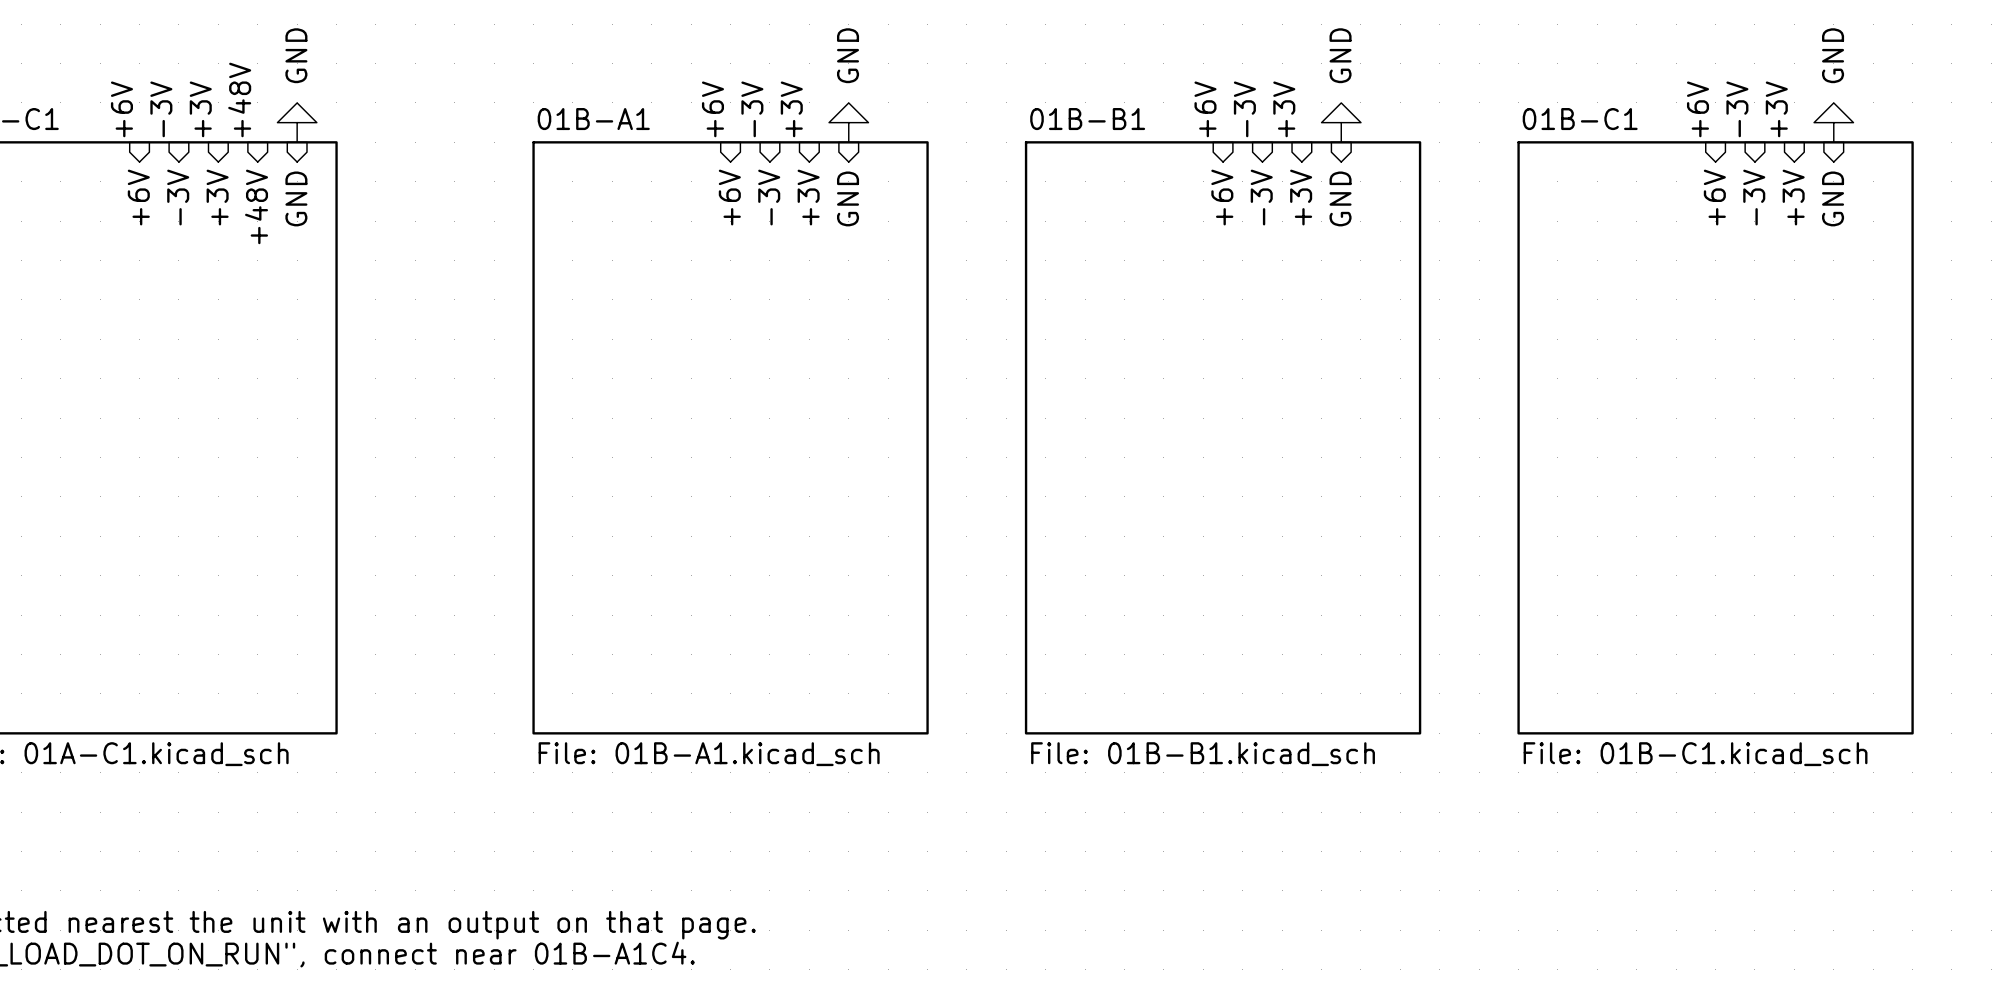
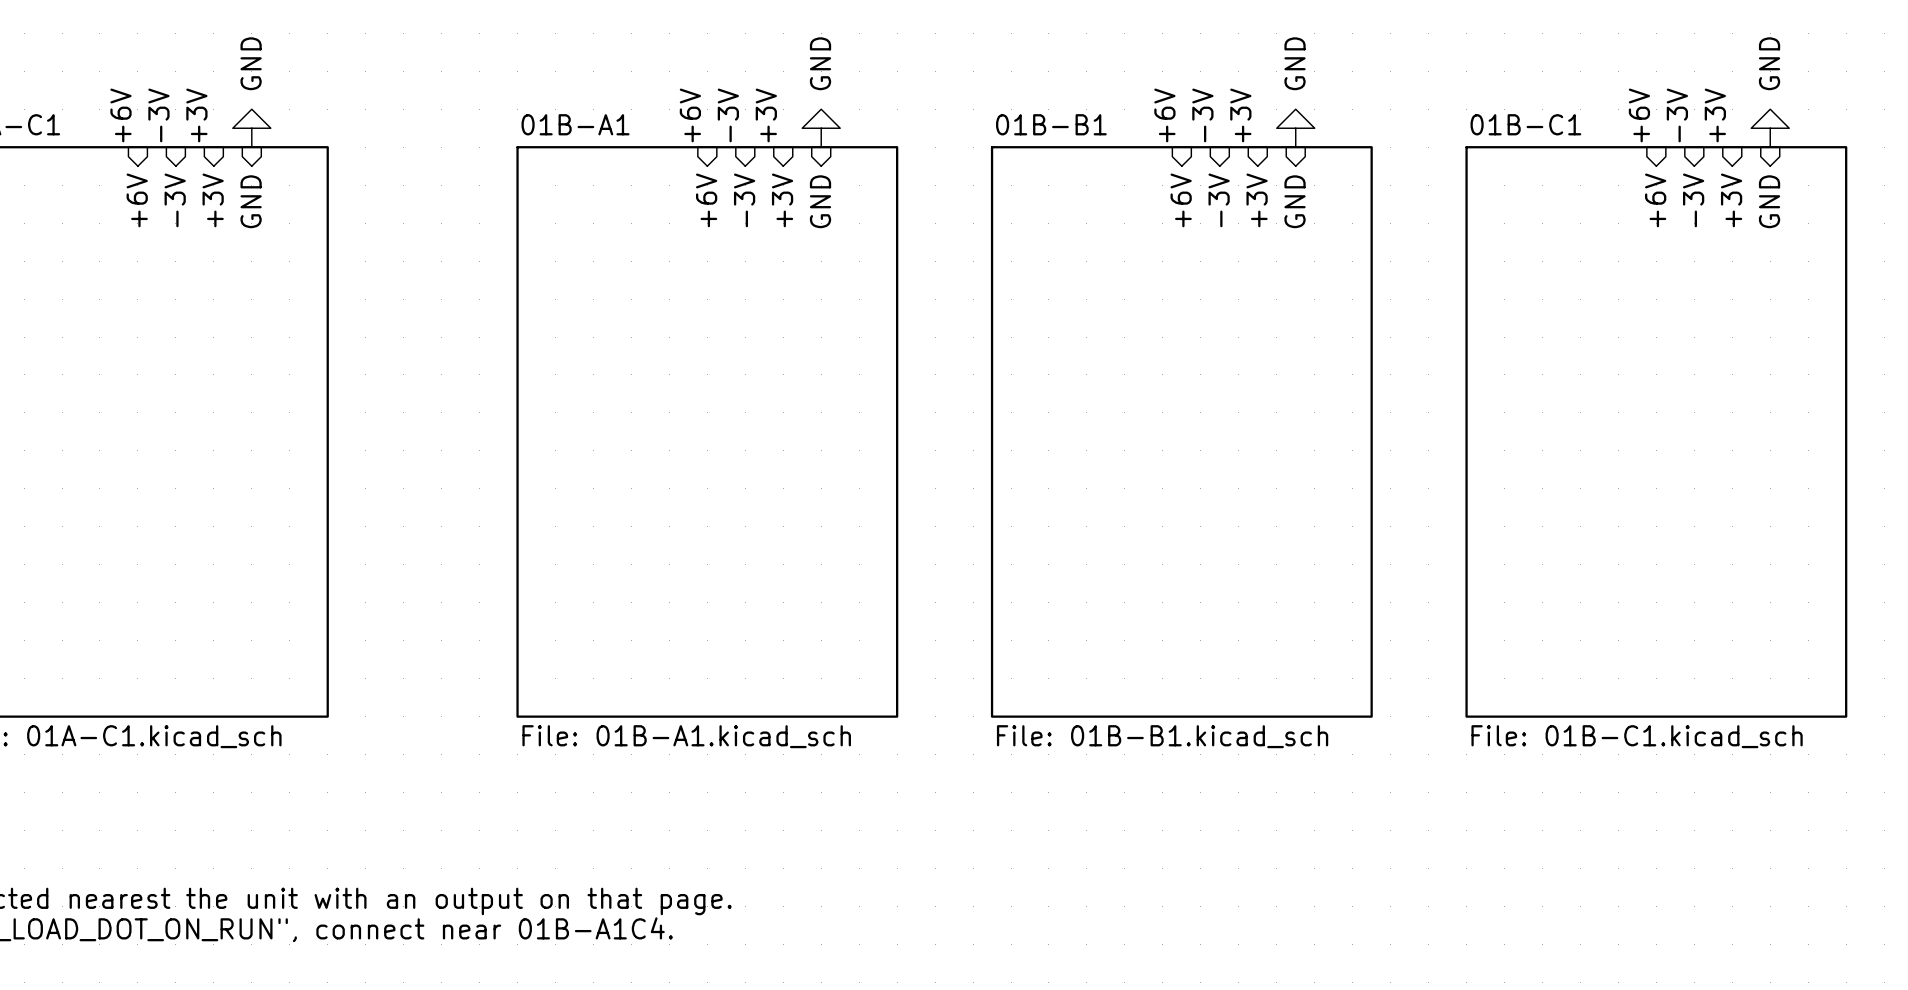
label: +48V (239, 99) -> none
power symbol position: GND (297, 122) -> GND (251, 128)
sheet pin: GND (296, 198) -> none
sheet pin: +48V (256, 206) -> GND (251, 201)

